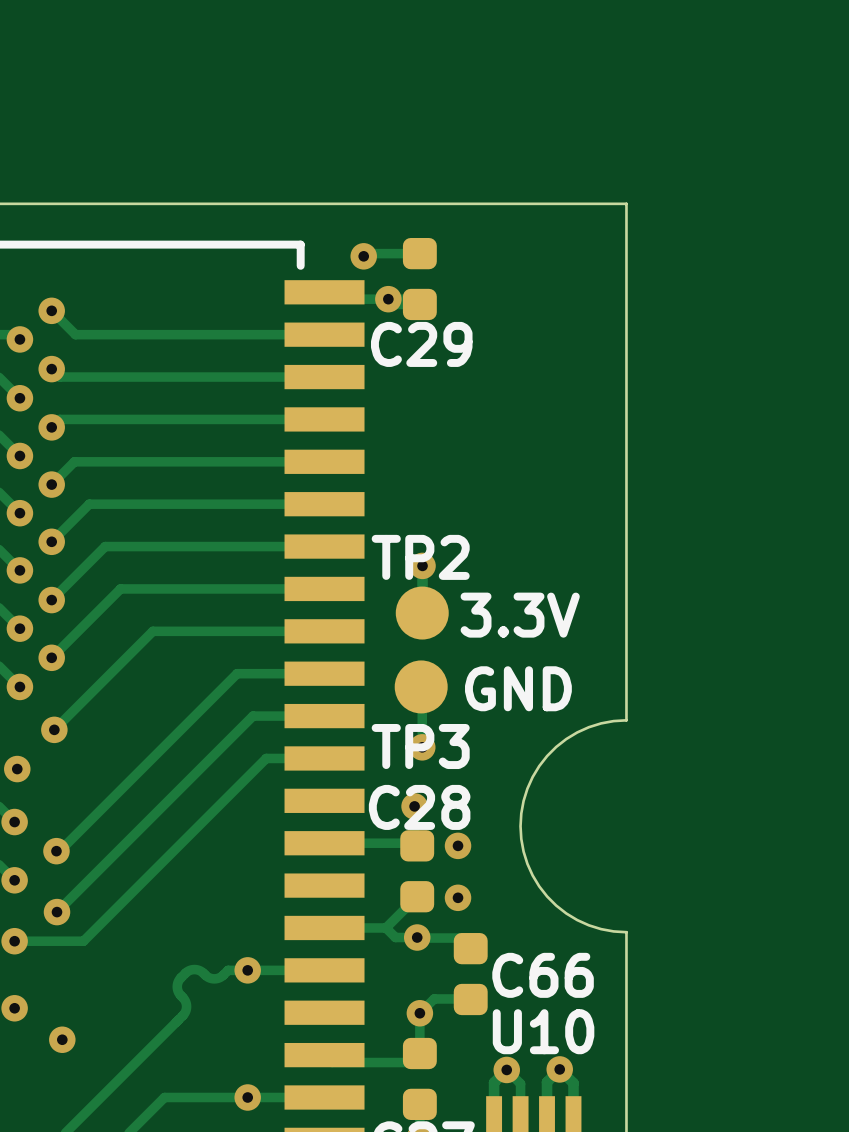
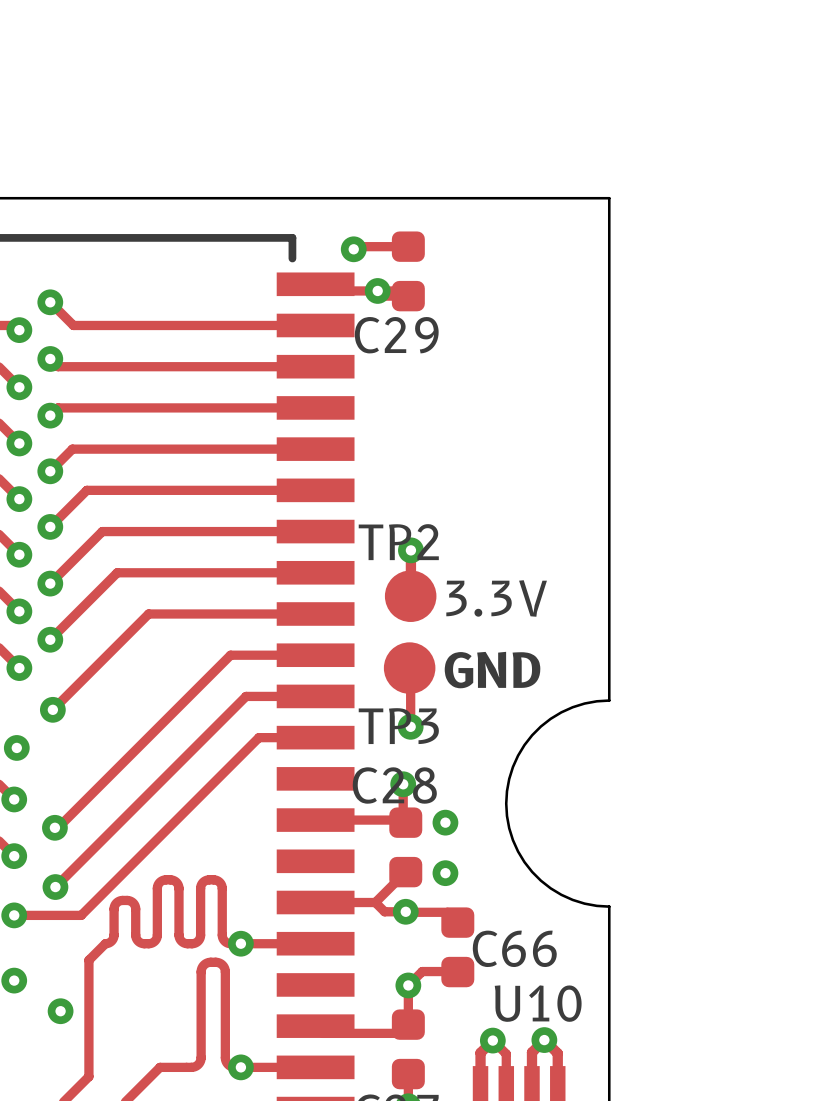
track: (237, 970) (228, 970) (221, 976) (214, 978) (197, 969) (190, 970) (185, 973) (179, 979) (177, 986) (186, 1003) (183, 1014) (91, 1107) -> (230, 943) (225, 941) (222, 936) (222, 887) (216, 880) (206, 880) (201, 885) (200, 936) (198, 940) (193, 943) (184, 943) (179, 937) (178, 887) (174, 880) (163, 880) (157, 885) (157, 936) (151, 943) (141, 943) (136, 938) (133, 903) (127, 900) (116, 902) (114, 908) (113, 938) (88, 960) (88, 1076)
track: (196, 1097) (241, 1097) -> (191, 1067) (197, 1065) (201, 1058) (201, 970) (203, 965) (210, 962) (220, 963) (225, 969) (225, 1058) (229, 1065) (235, 1067)

